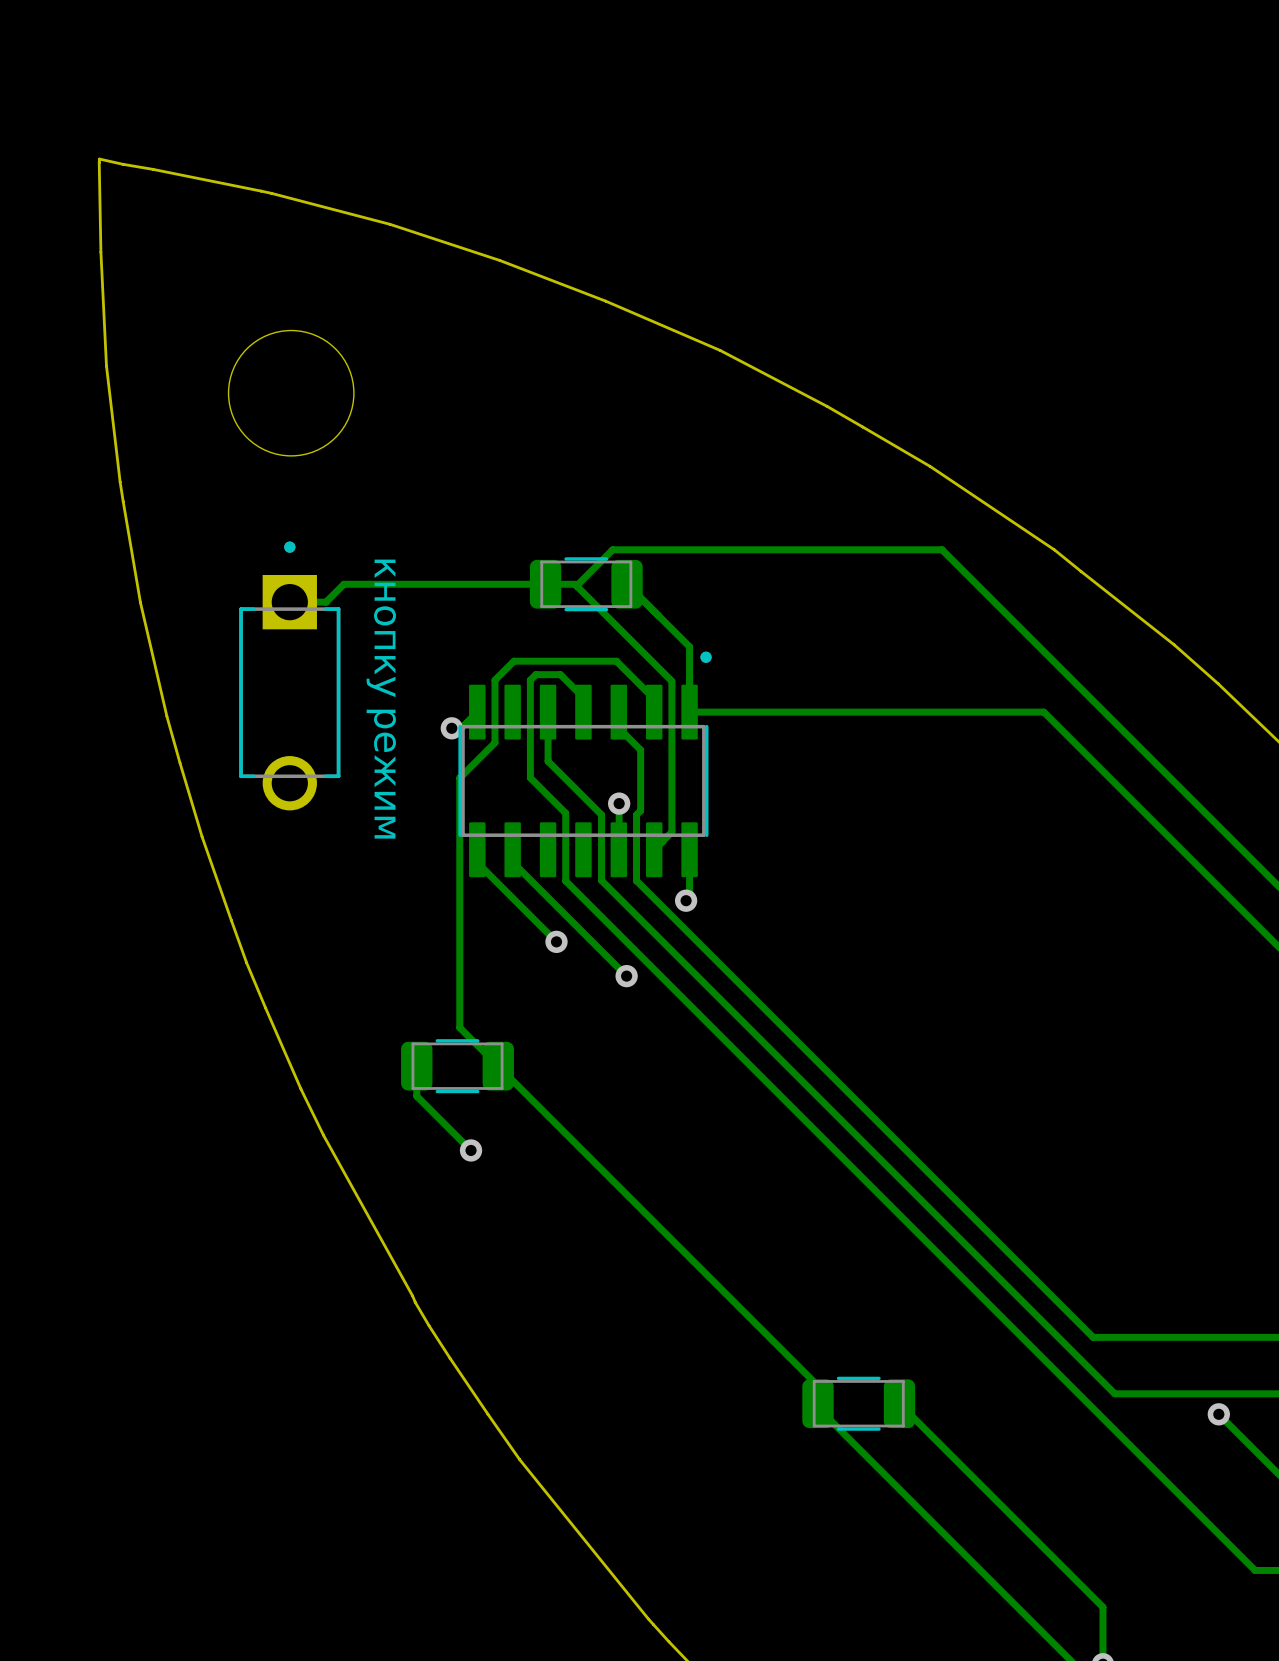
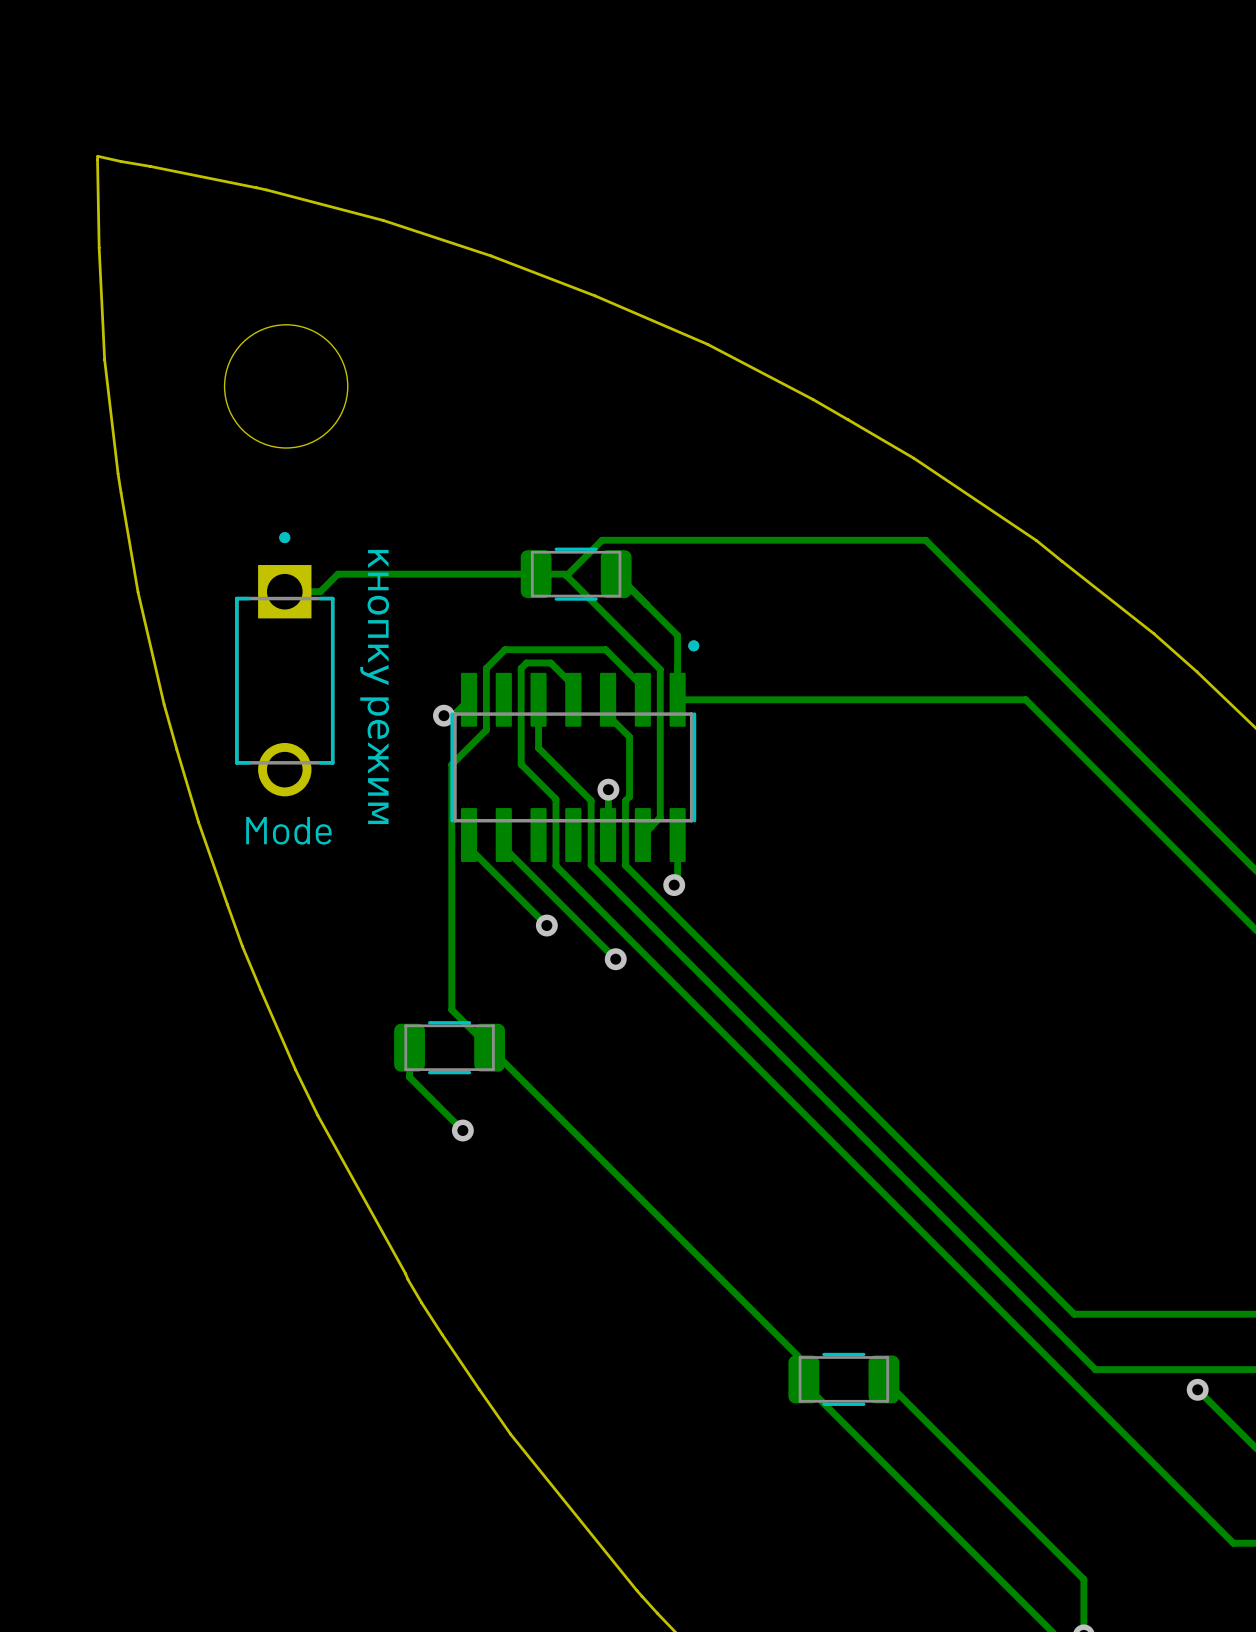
part text: none -> Mode (288, 830)

